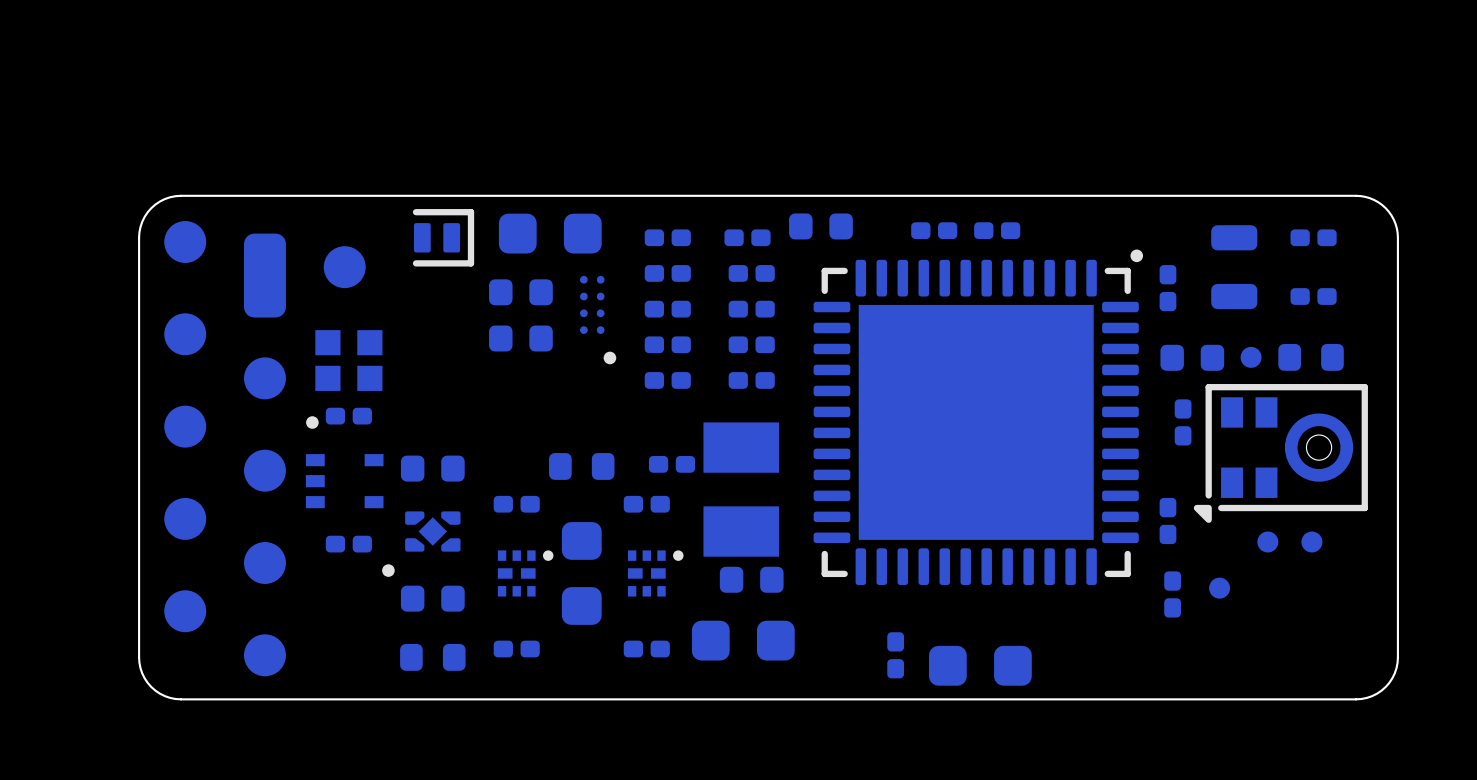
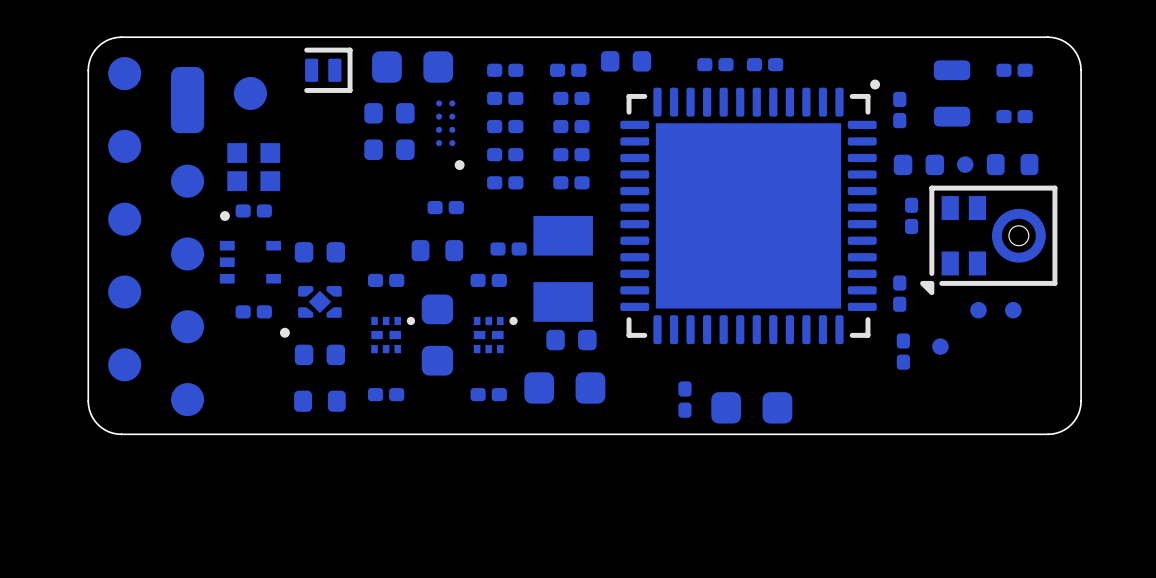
part: none -> (445, 207)

